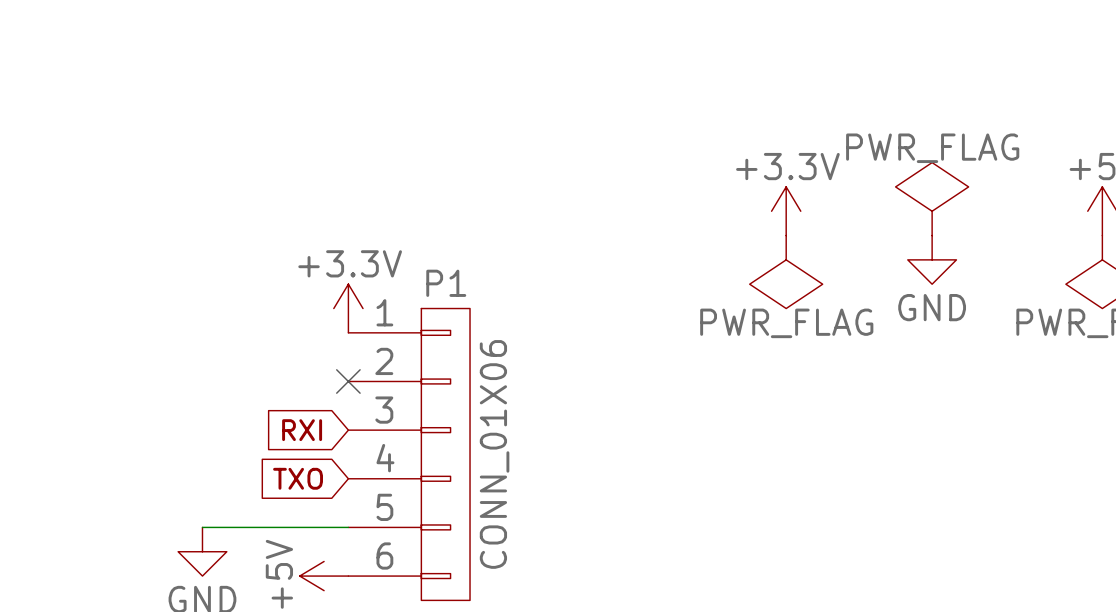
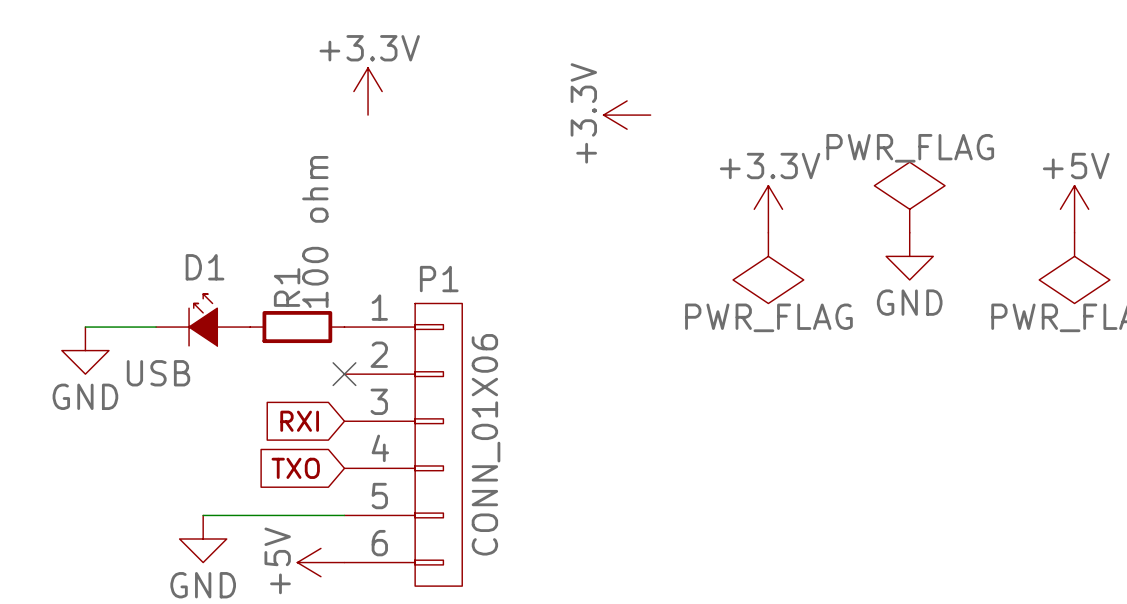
power symbol: none -> +3.3V (368, 91)
power symbol: none -> +3.3V (627, 115)
power symbol: +3.3V (348, 308) -> none
D1: none -> USB (203, 319)
wire: none -> (85, 327) (156, 327)
R1: none -> 100 ohm (297, 327)
power symbol: none -> GND (85, 350)

